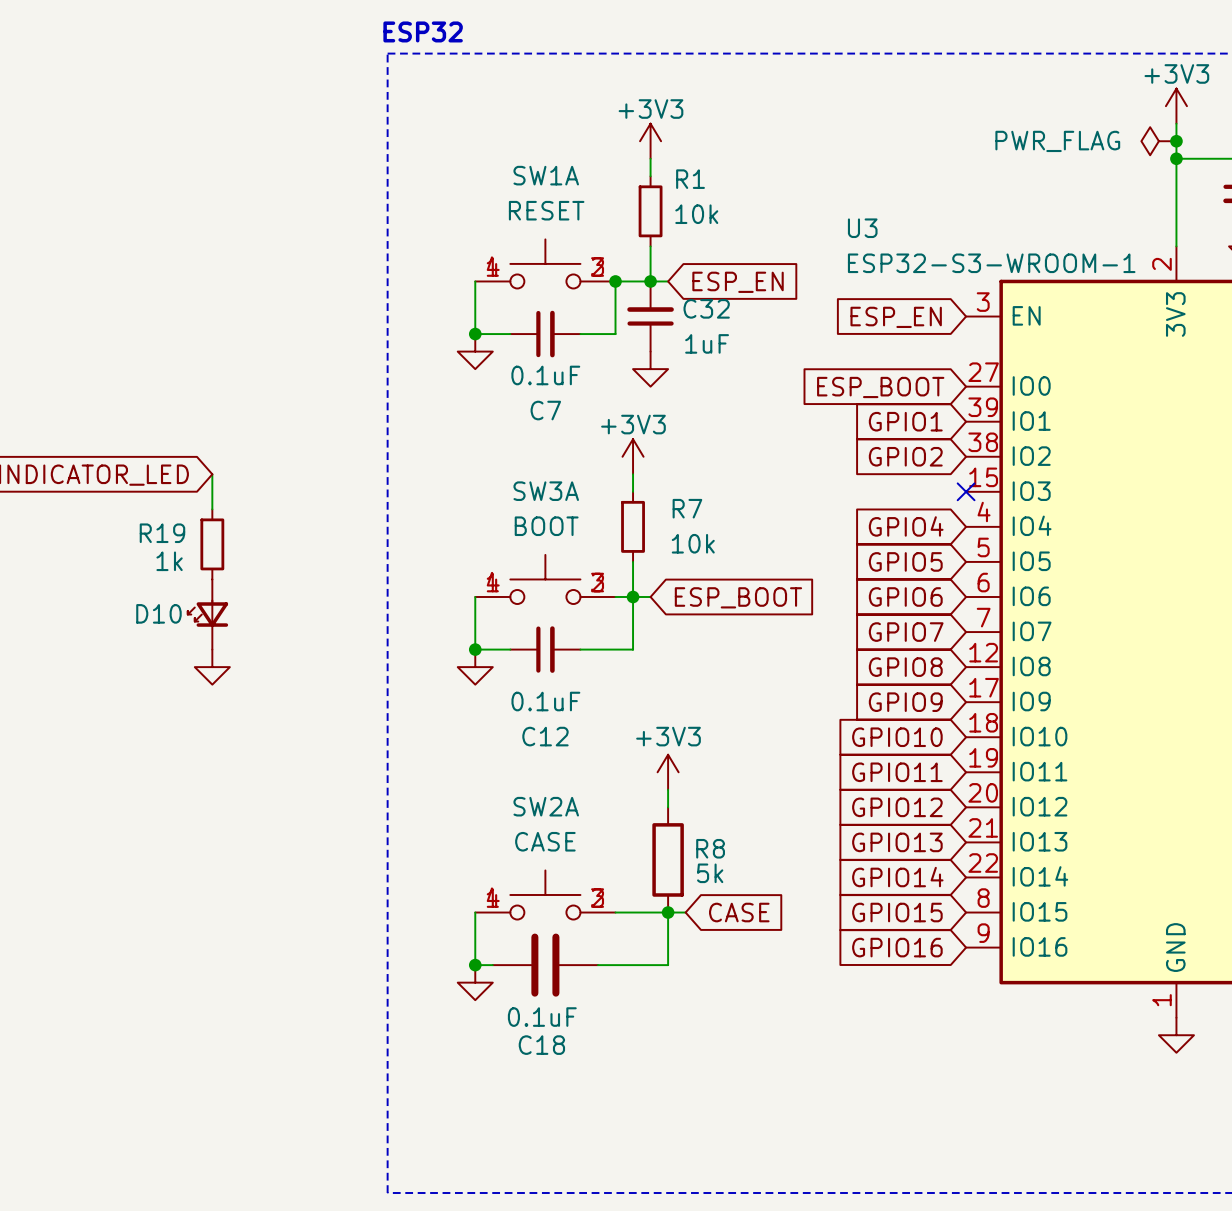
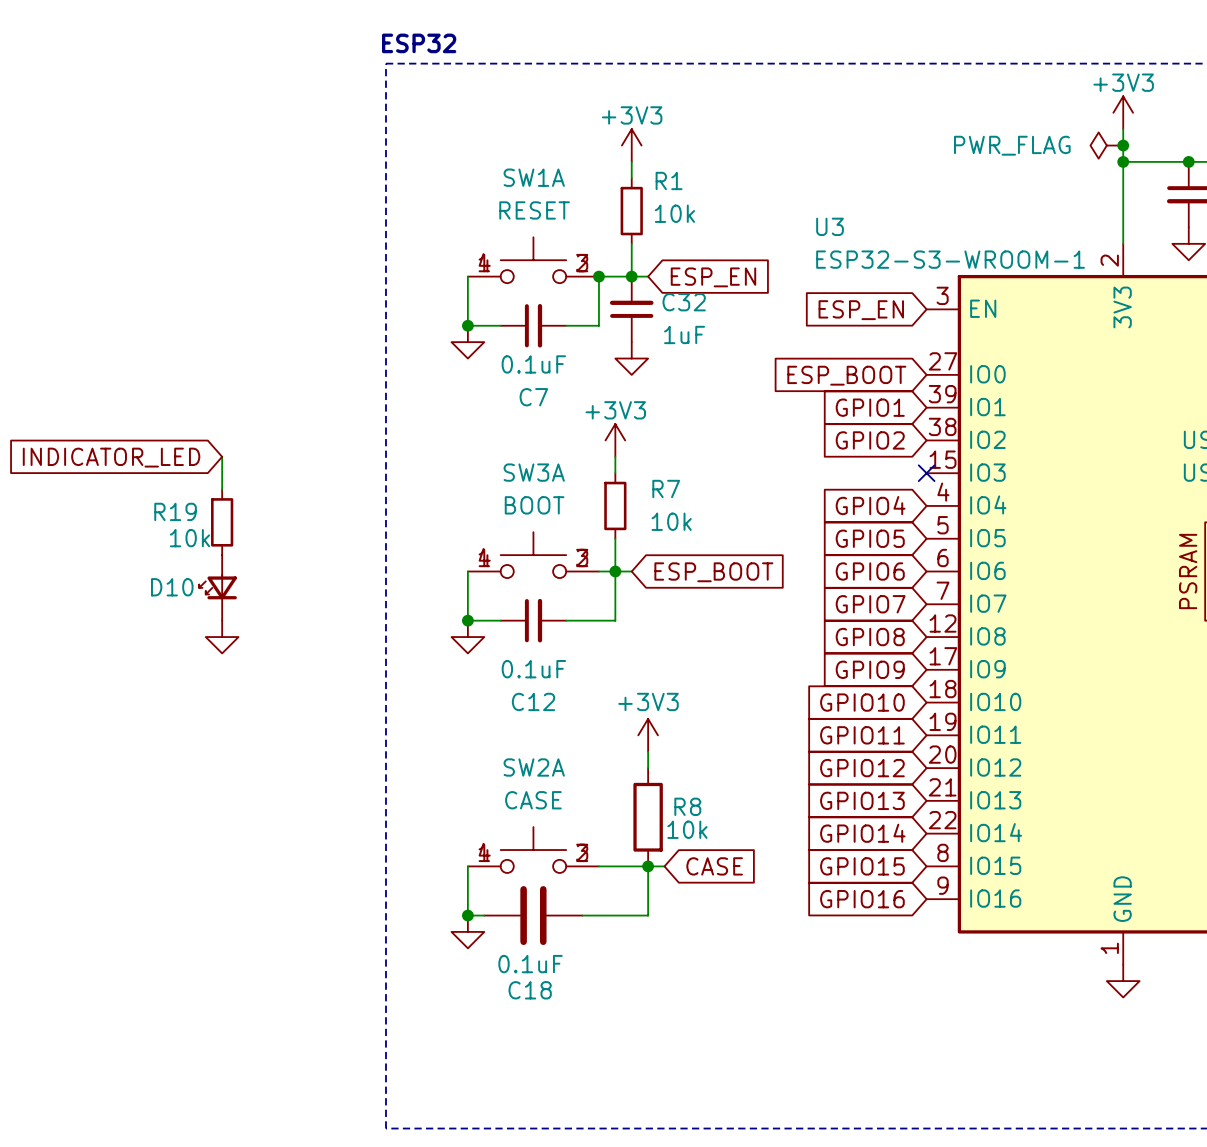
R19 value: 1k (169, 561) -> 10k (189, 538)
R8 value: 5k (710, 873) -> 10k (687, 829)

